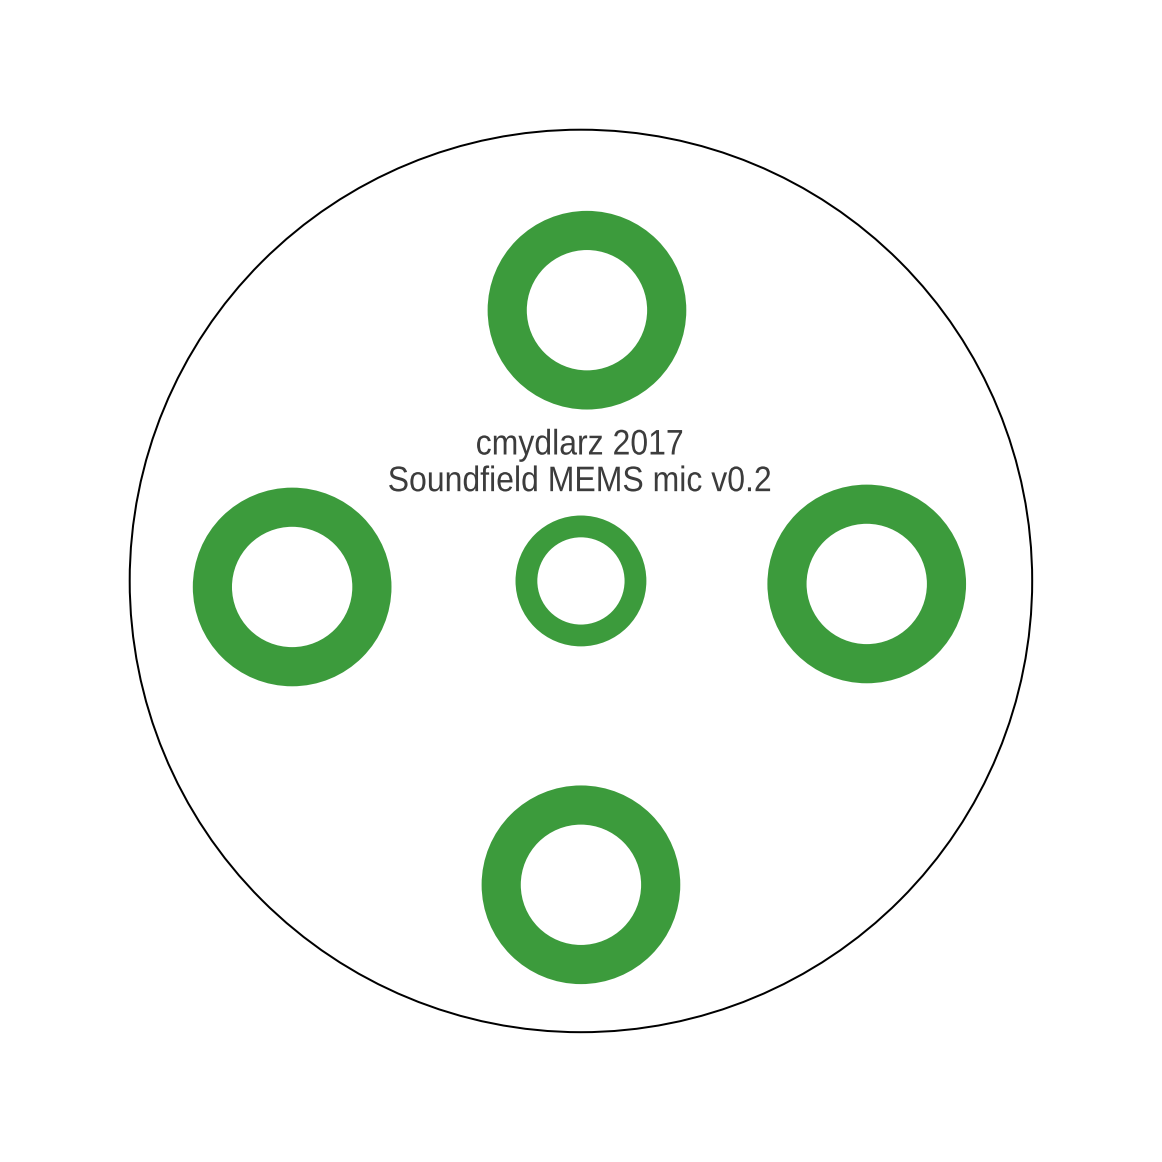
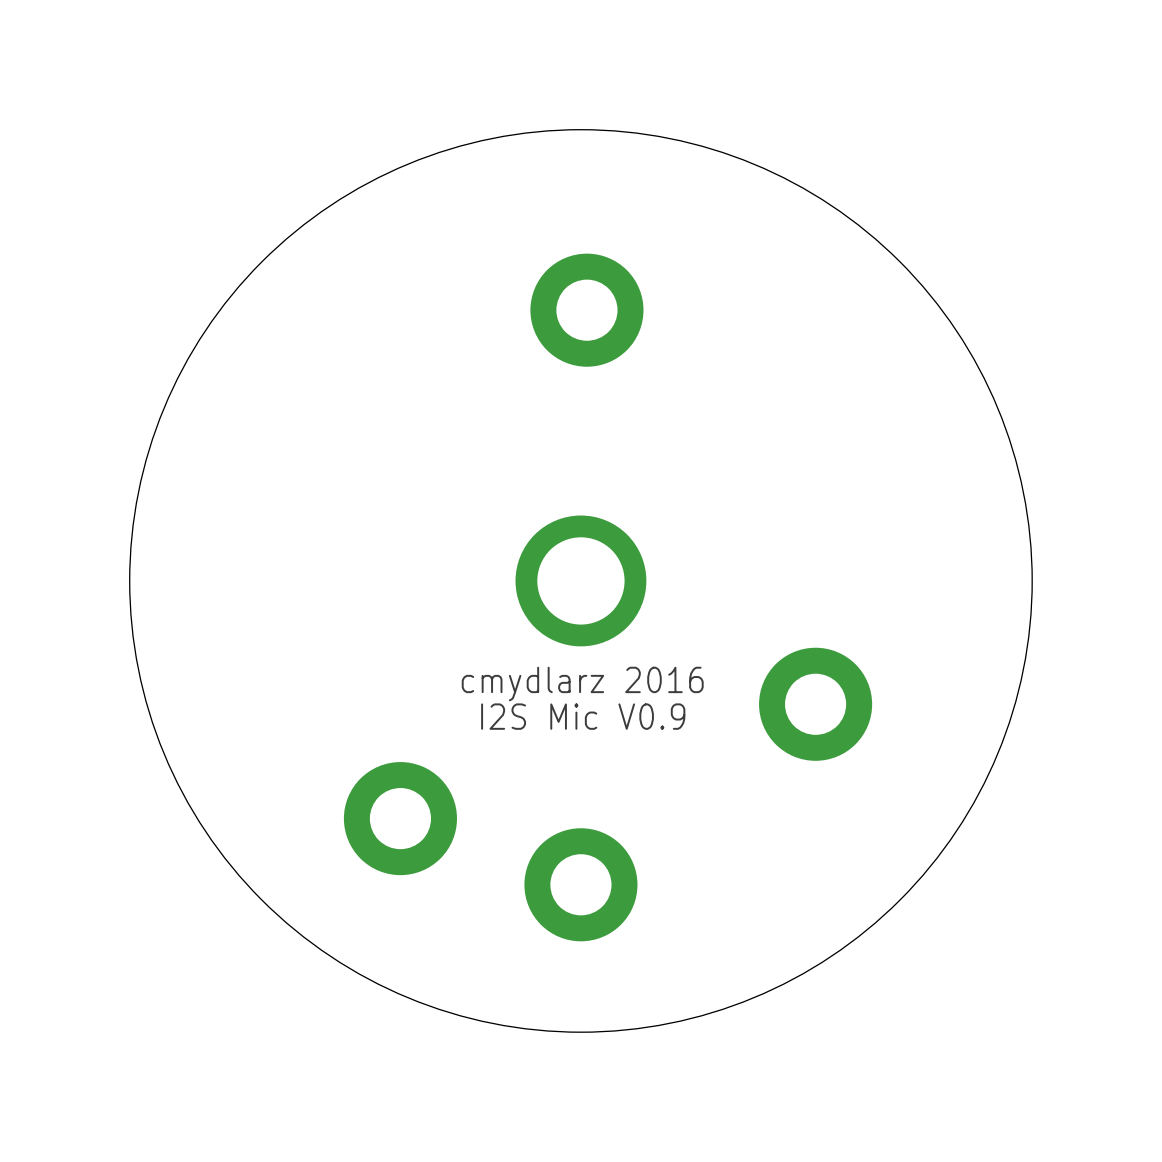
part footprint: [487, 210, 687, 410] -> [530, 253, 644, 367]
text: cmydlarz 2017 (579, 445) -> none
text: Soundfield MEMS mic v0.2 (579, 478) -> none
part: (866, 583) -> none
part: (292, 586) -> none
text: none -> cmydlarz 2016 (582, 684)
part: none -> (815, 704)
text: none -> I2S Mic V0.9 (583, 716)
part footprint: [481, 785, 681, 985] -> [524, 828, 638, 942]
part: none -> (400, 818)

